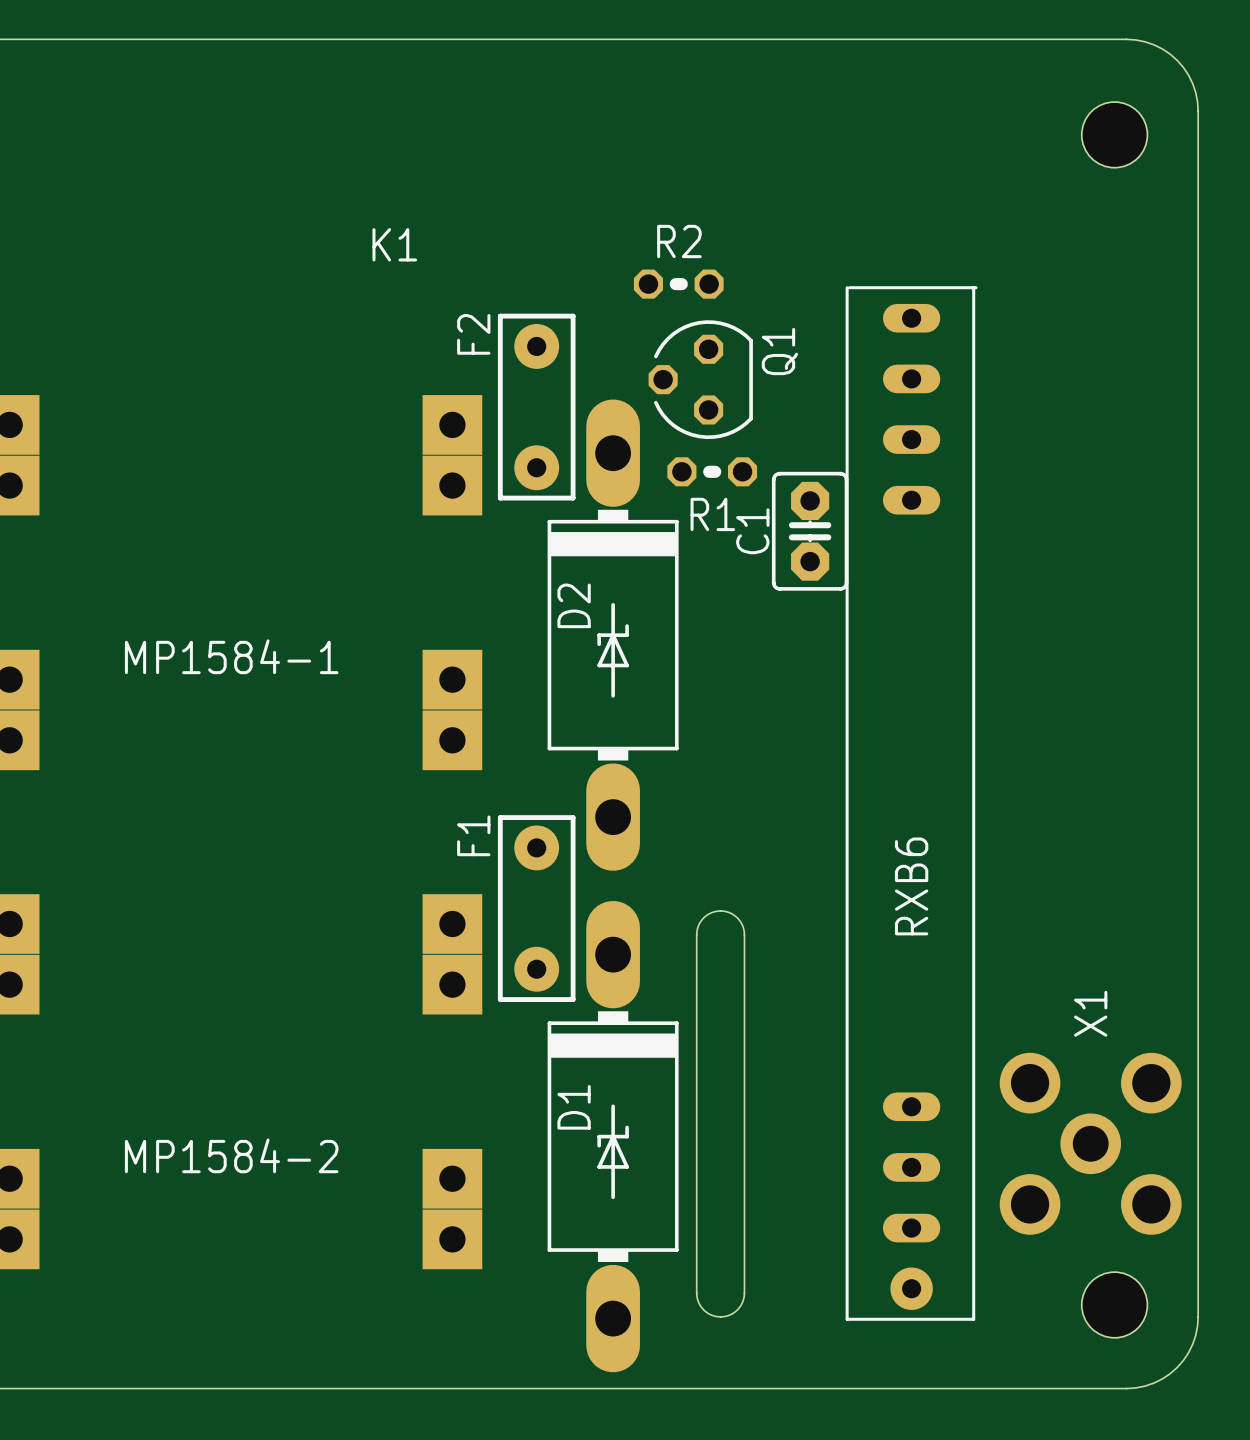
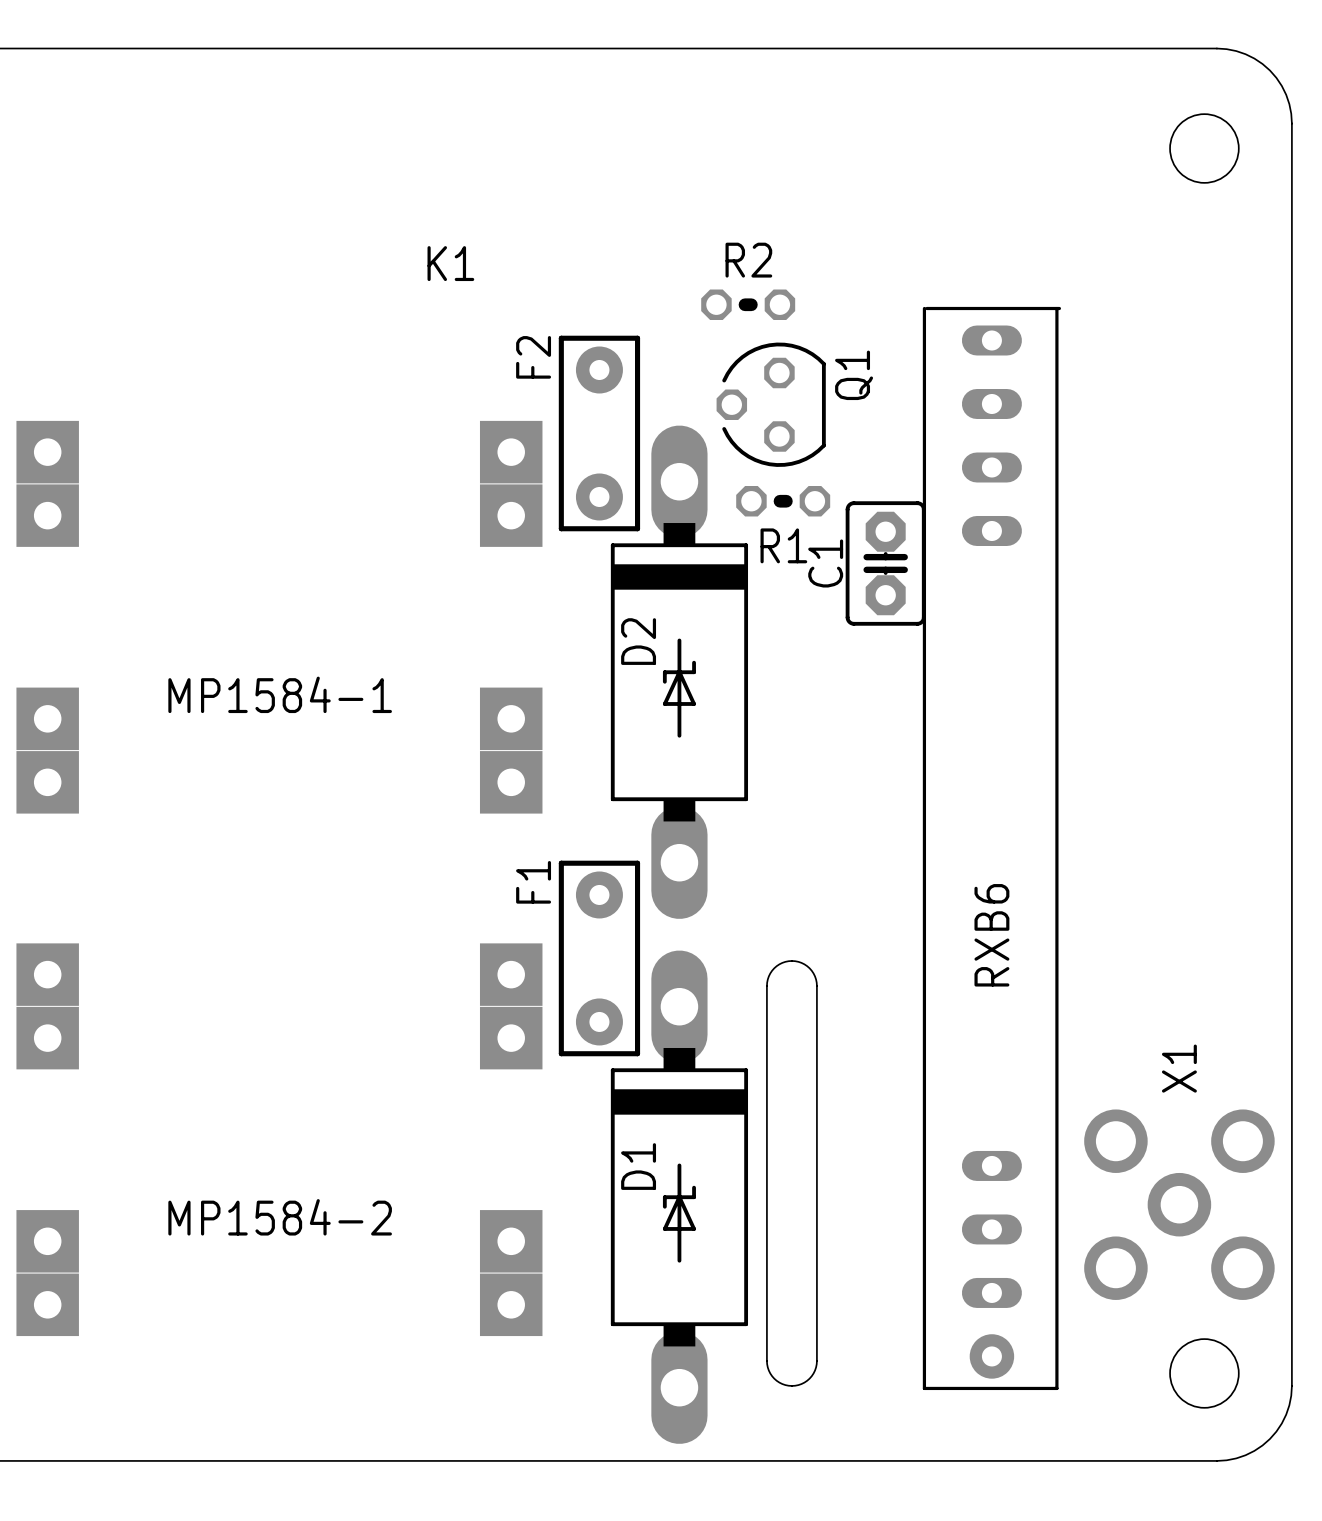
D2 footprint: [547, 399, 679, 871] -> [610, 425, 749, 919]
D1 footprint: [547, 900, 679, 1373] -> [610, 950, 749, 1444]

